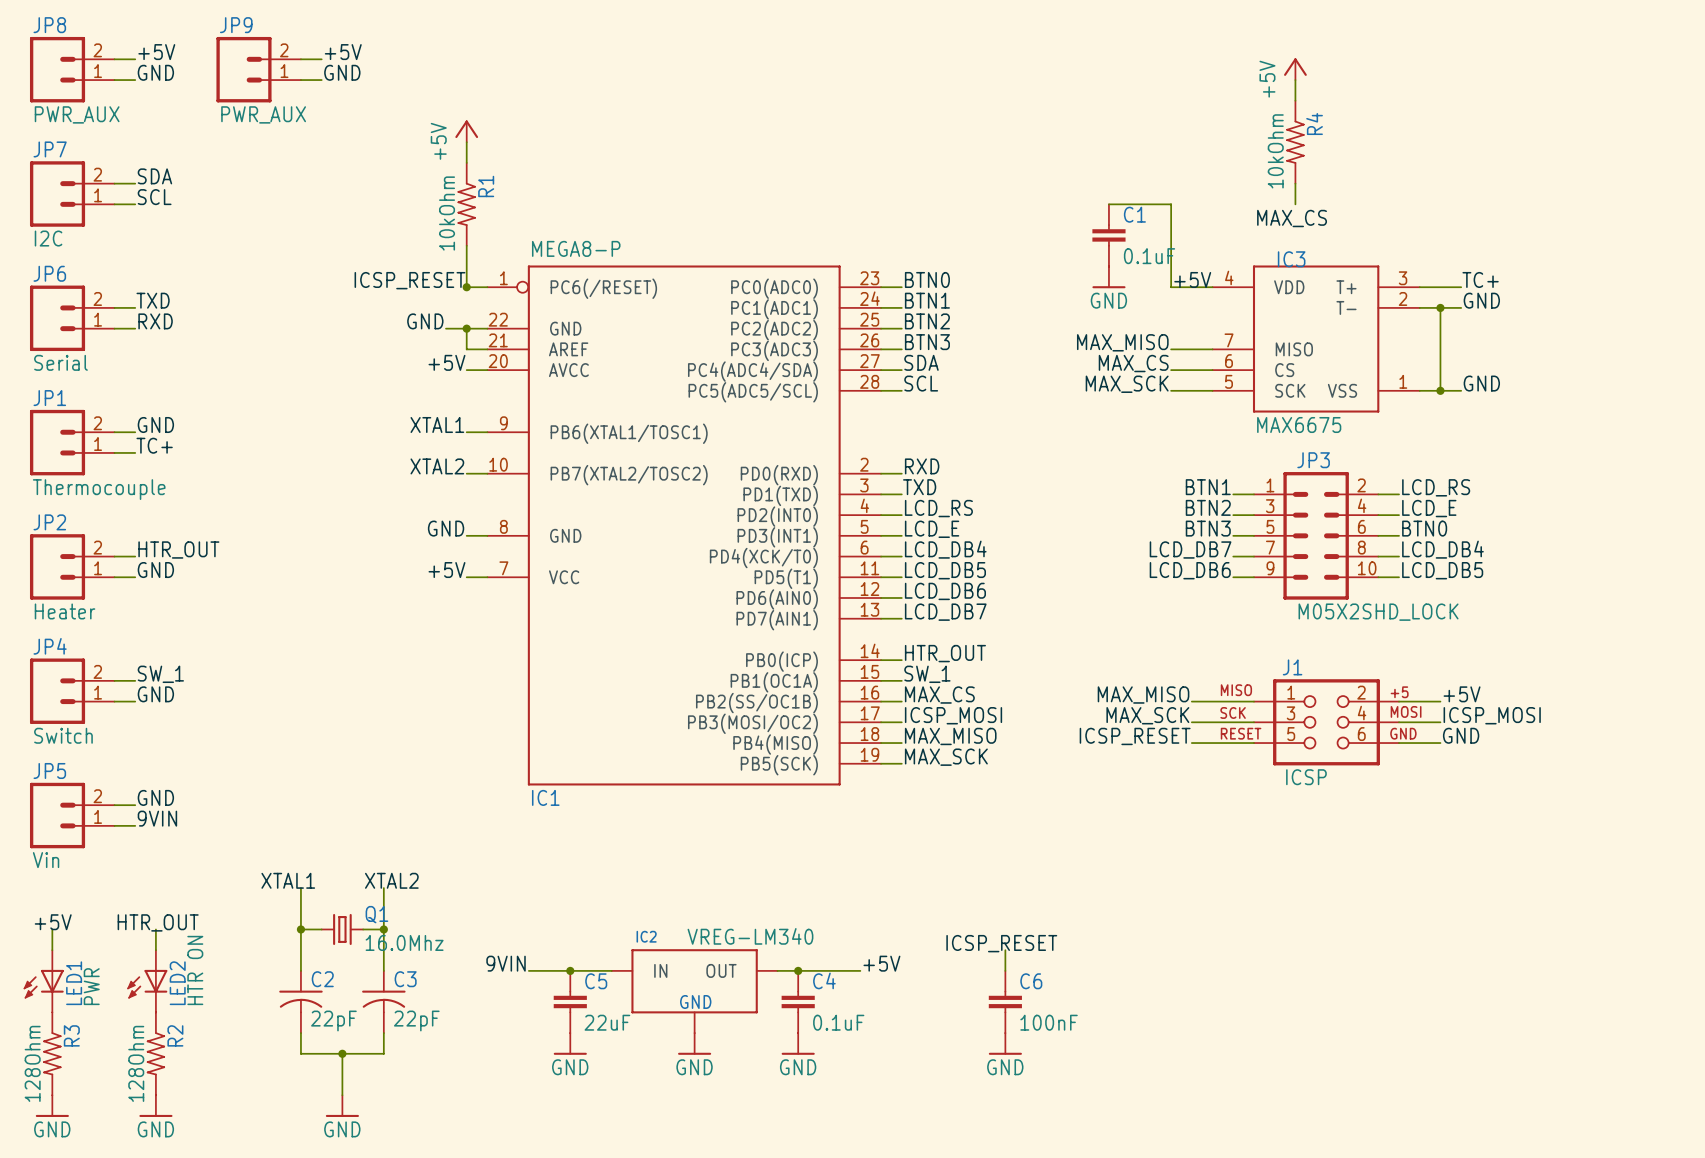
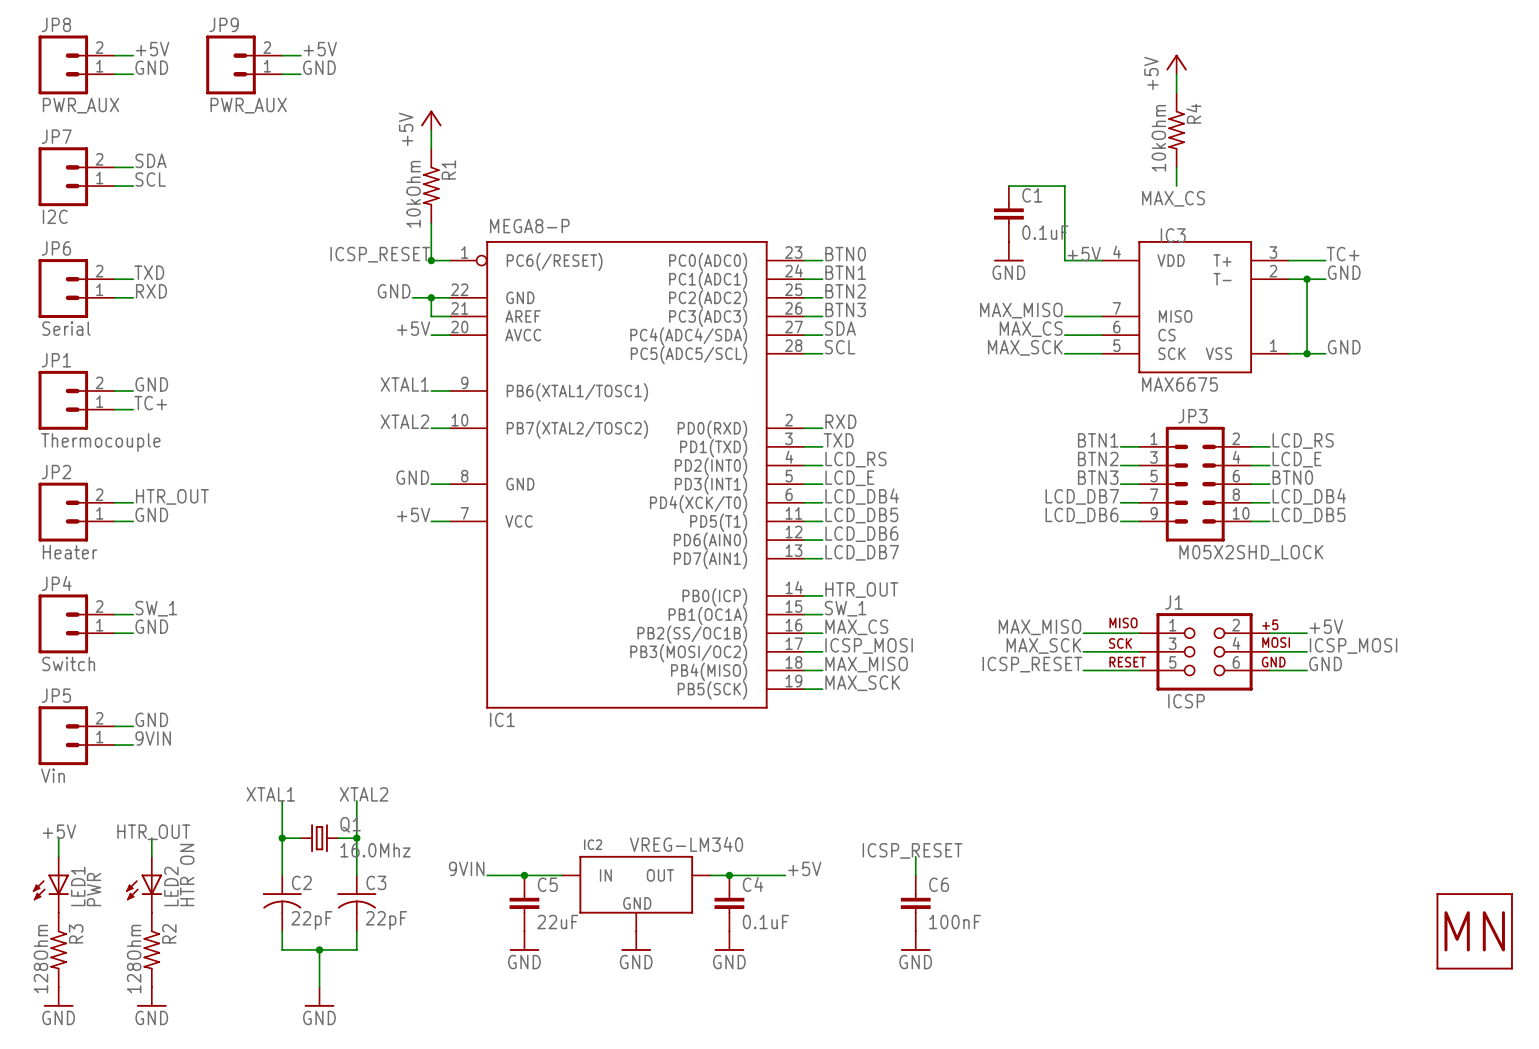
part: none -> (1474, 931)

